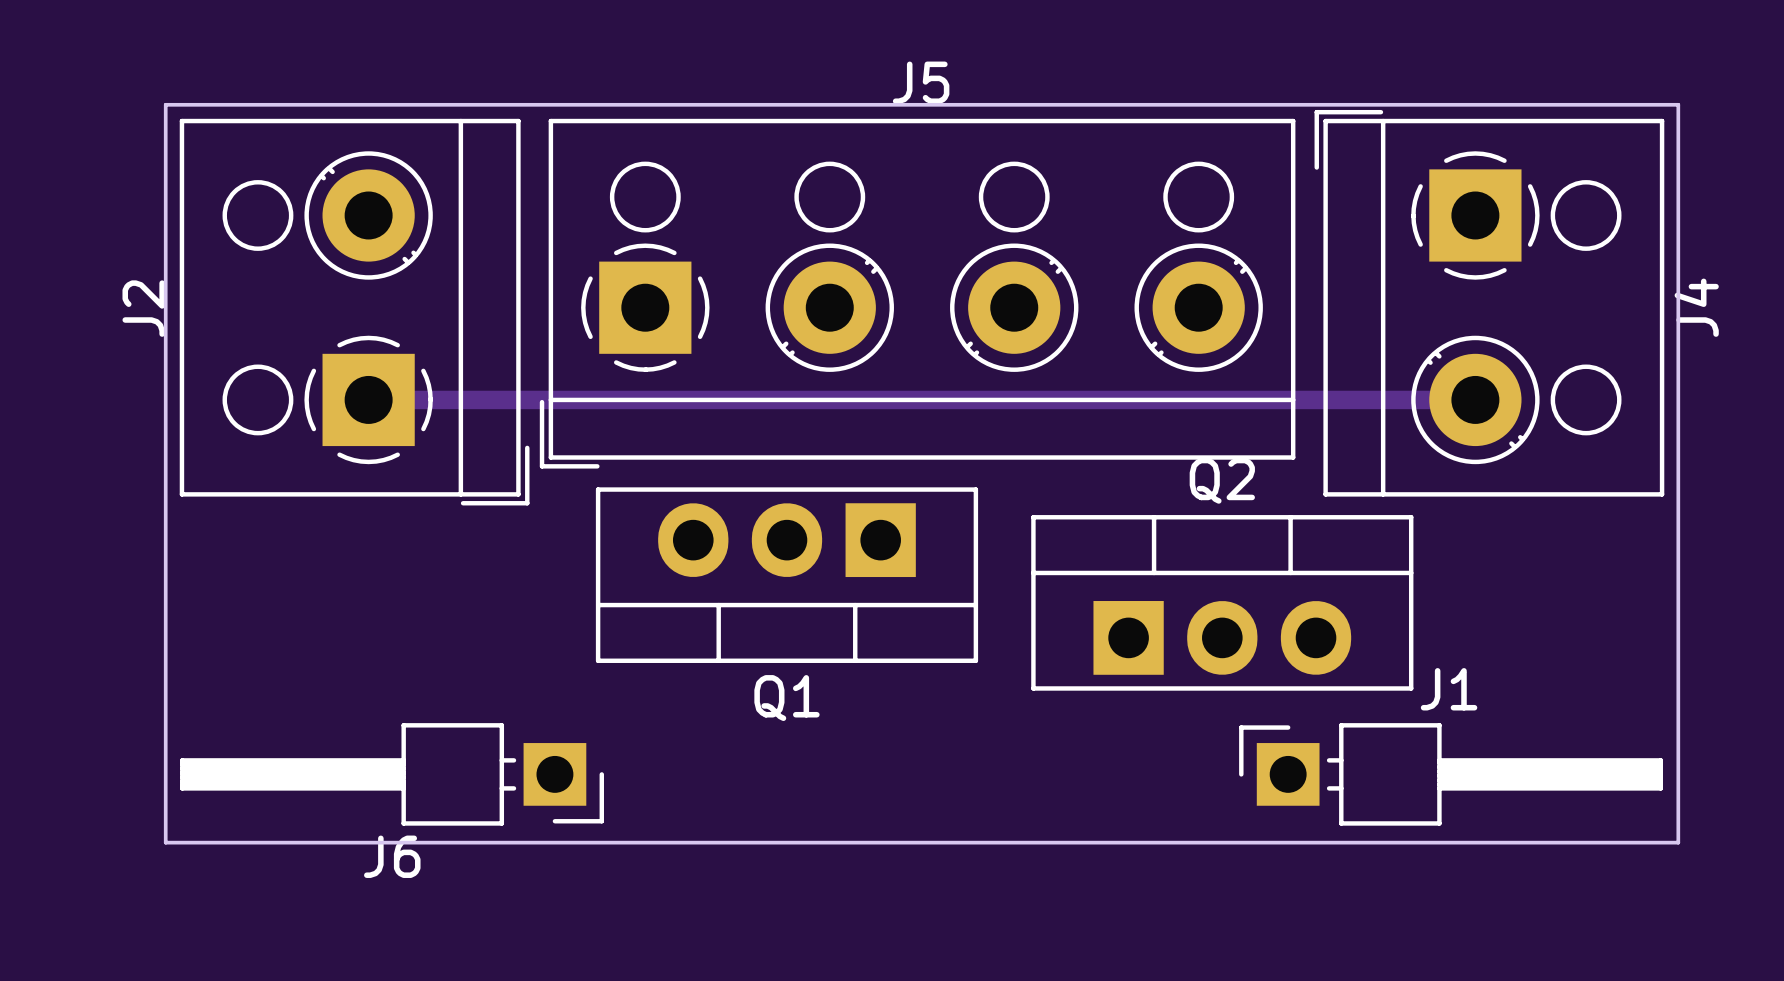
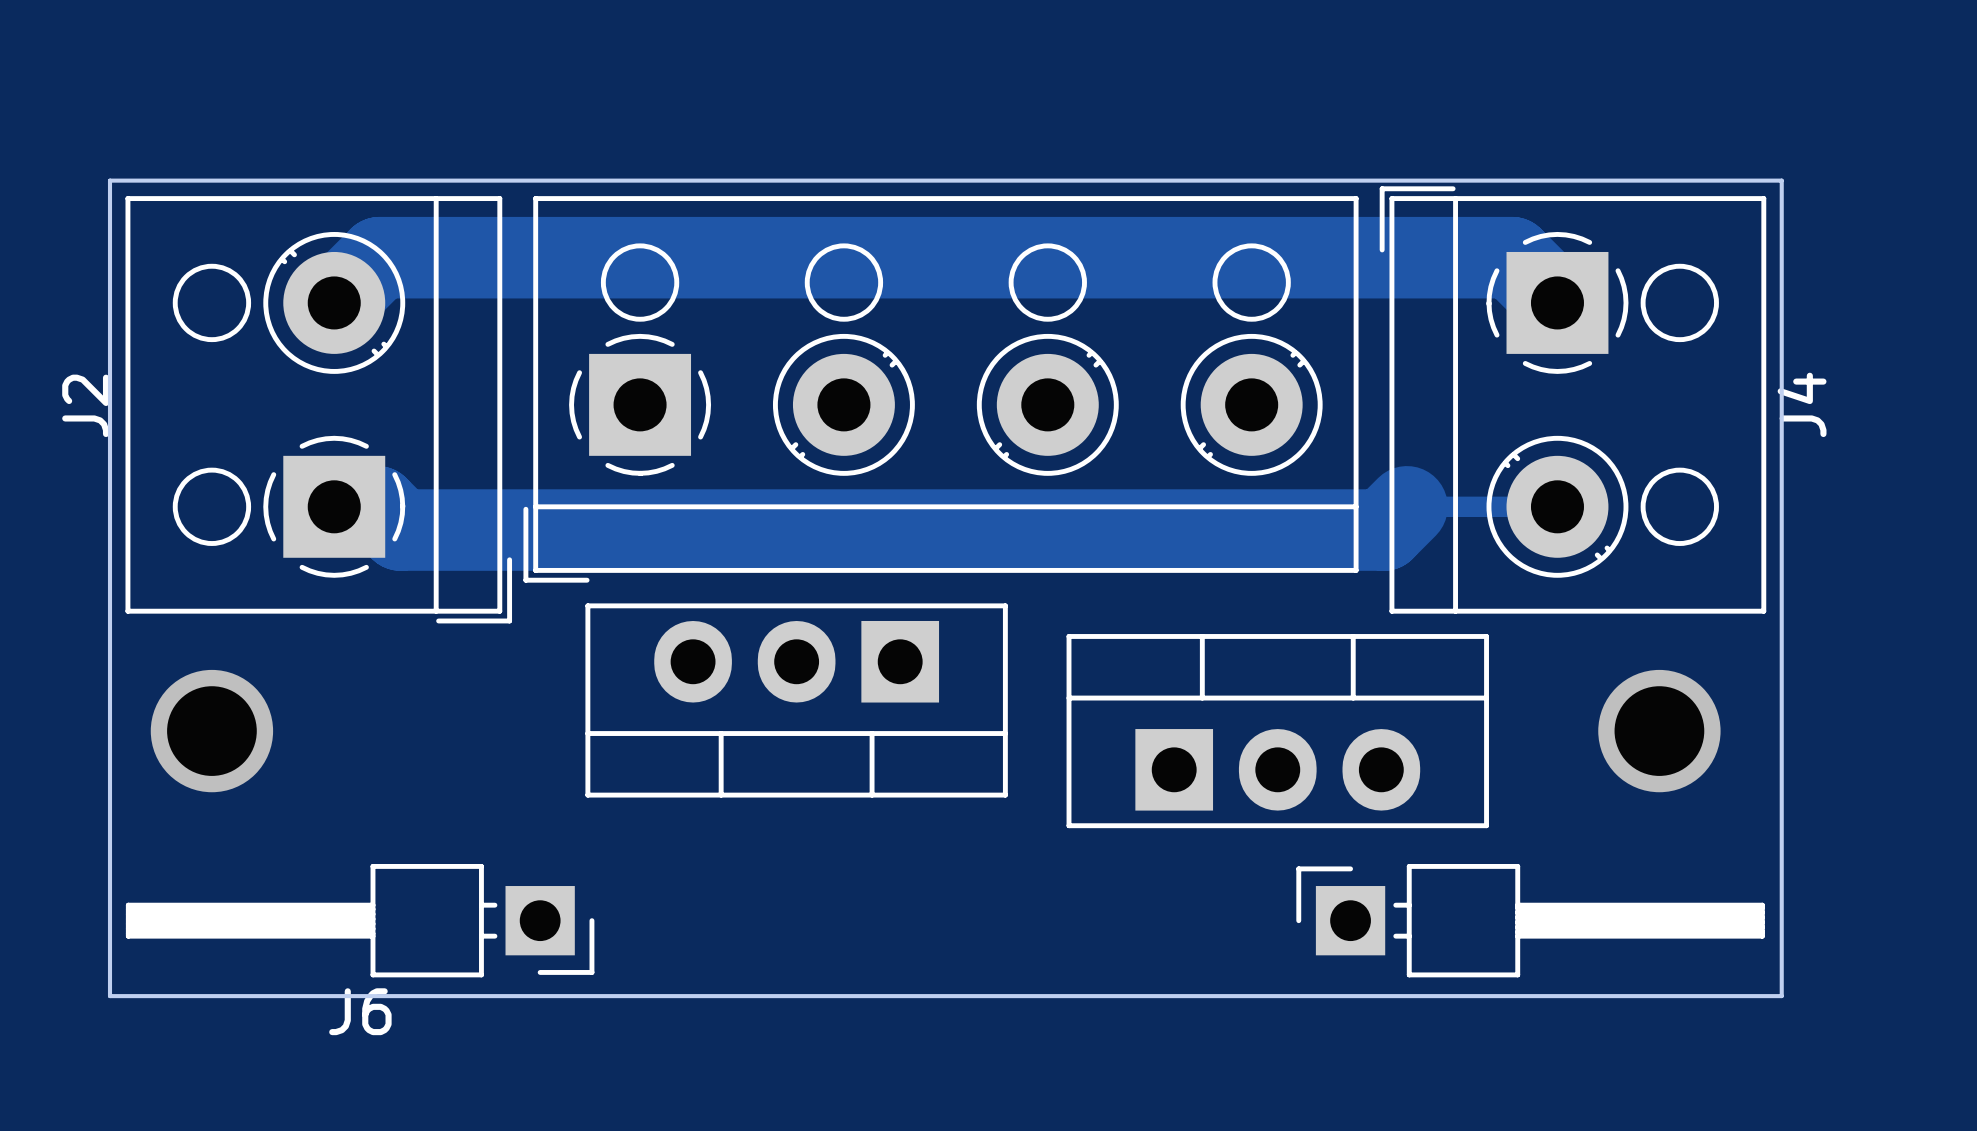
J5 name: J5 (921, 82) -> none
track: none -> (334, 302) (379, 257) (1512, 257) (1557, 302)
track: (407, 399) (1339, 399) -> (377, 506) (400, 530) (1383, 530) (1407, 506)
Q2 name: Q2 (1222, 480) -> none
via: none -> (211, 731)
via: none -> (1659, 731)
J1 name: J1 (1449, 689) -> none
Q1 name: Q1 (786, 698) -> none

